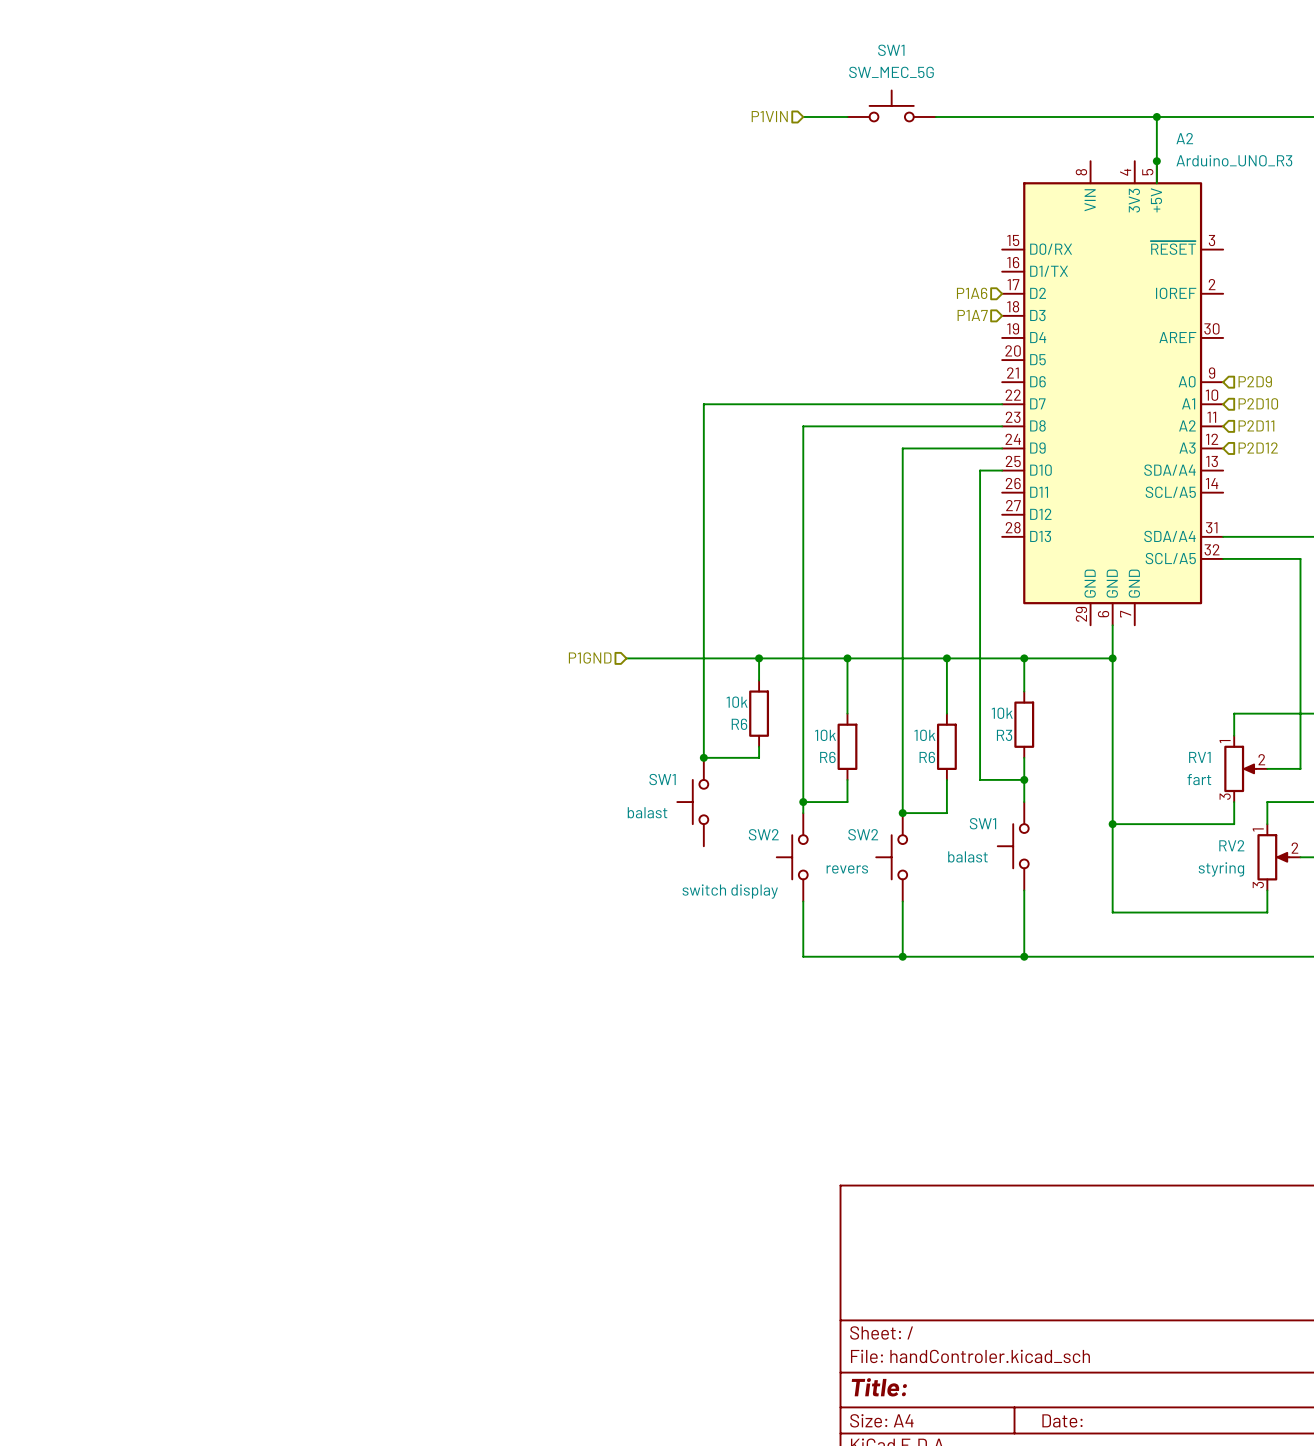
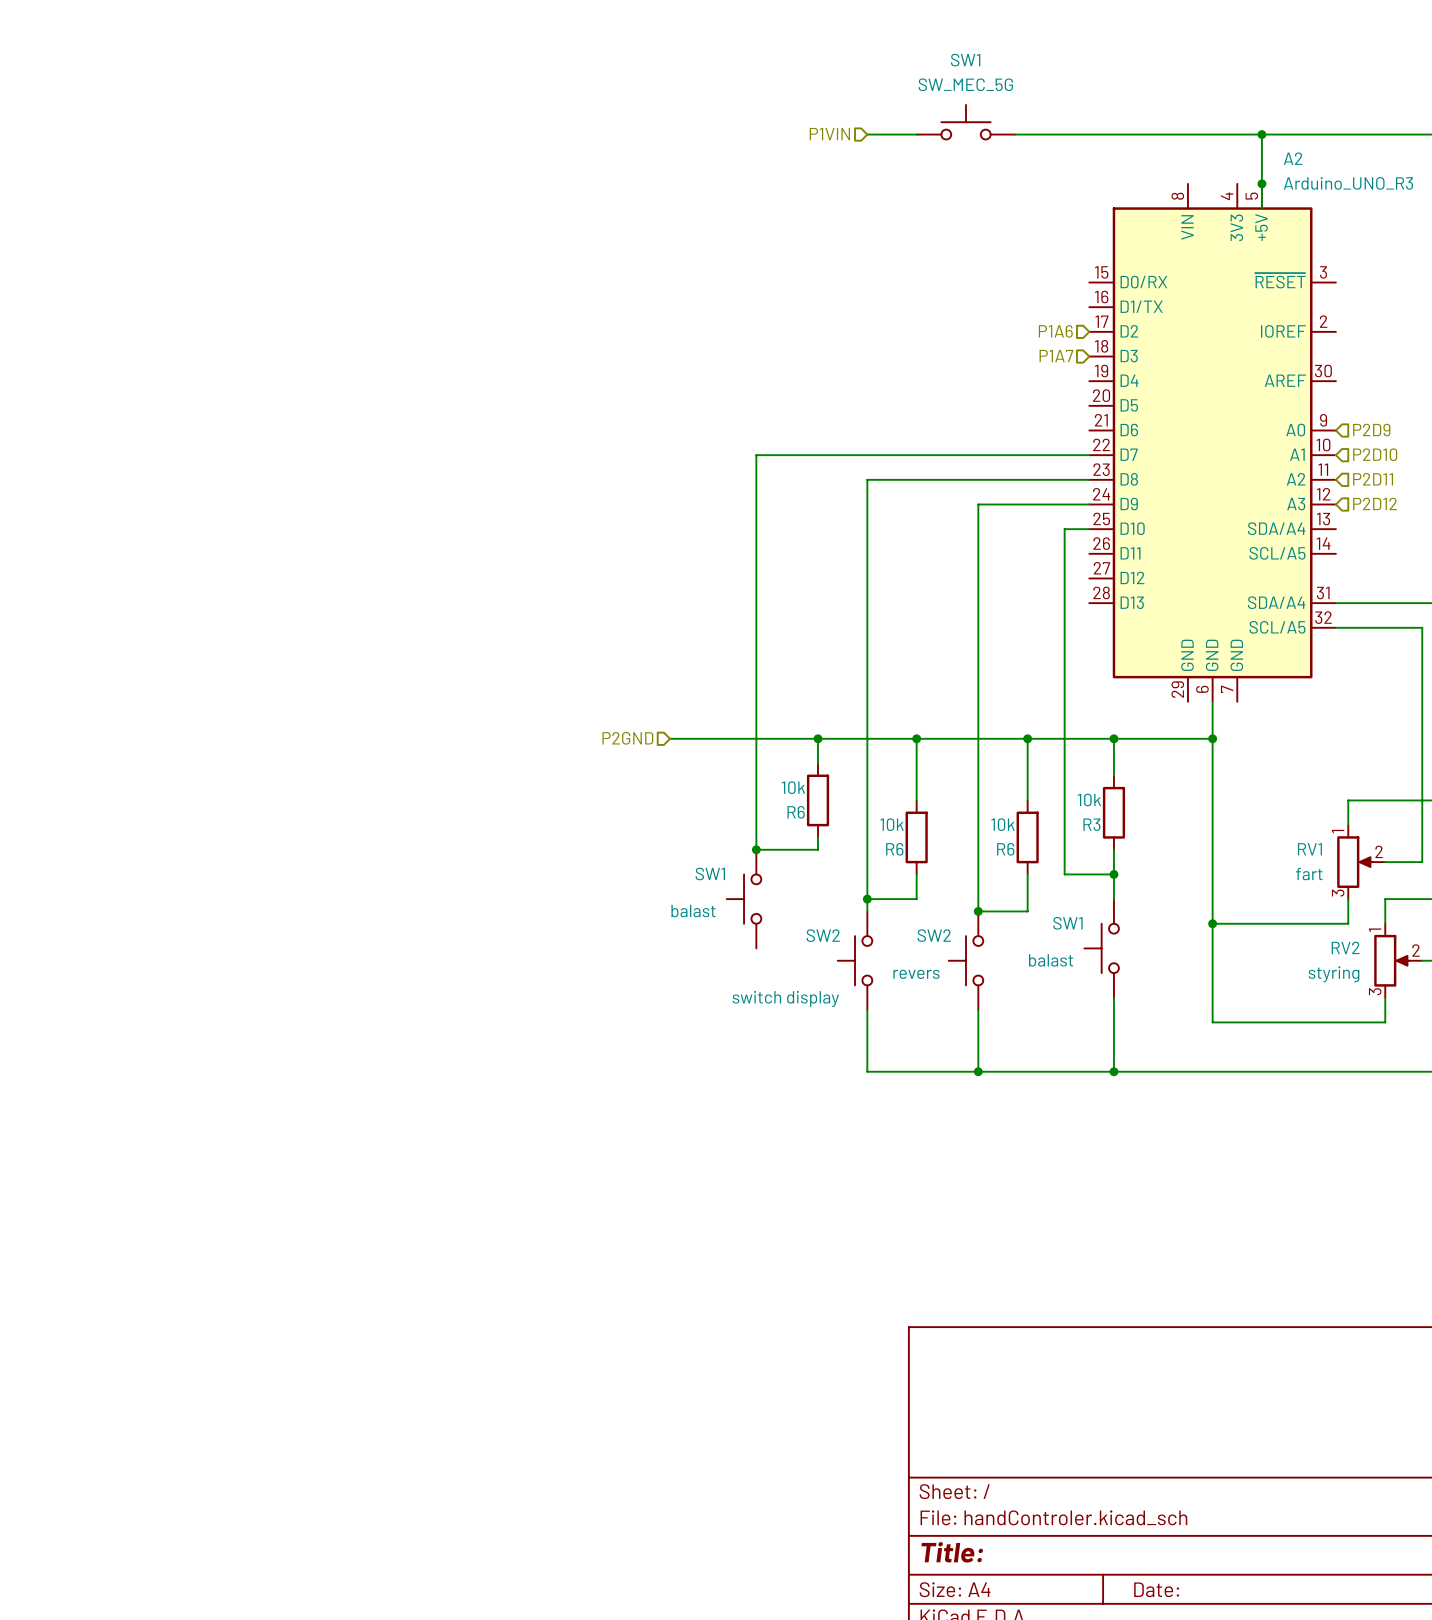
hierarchical label: P1GND (590, 657) -> P2GND (627, 738)

